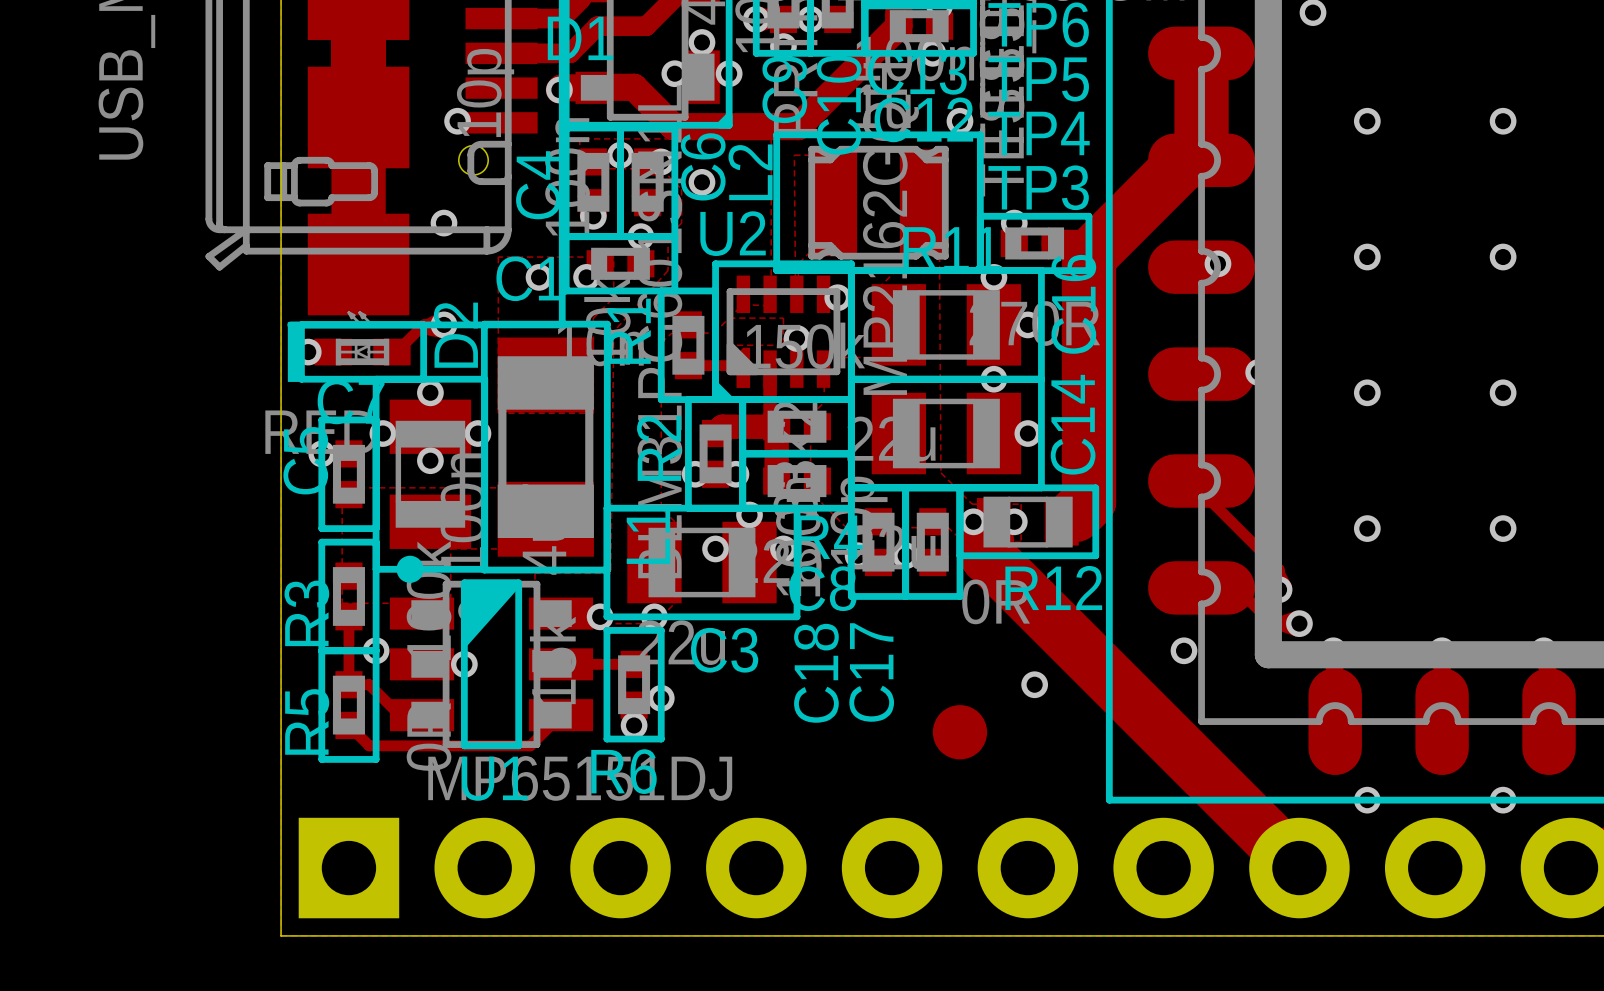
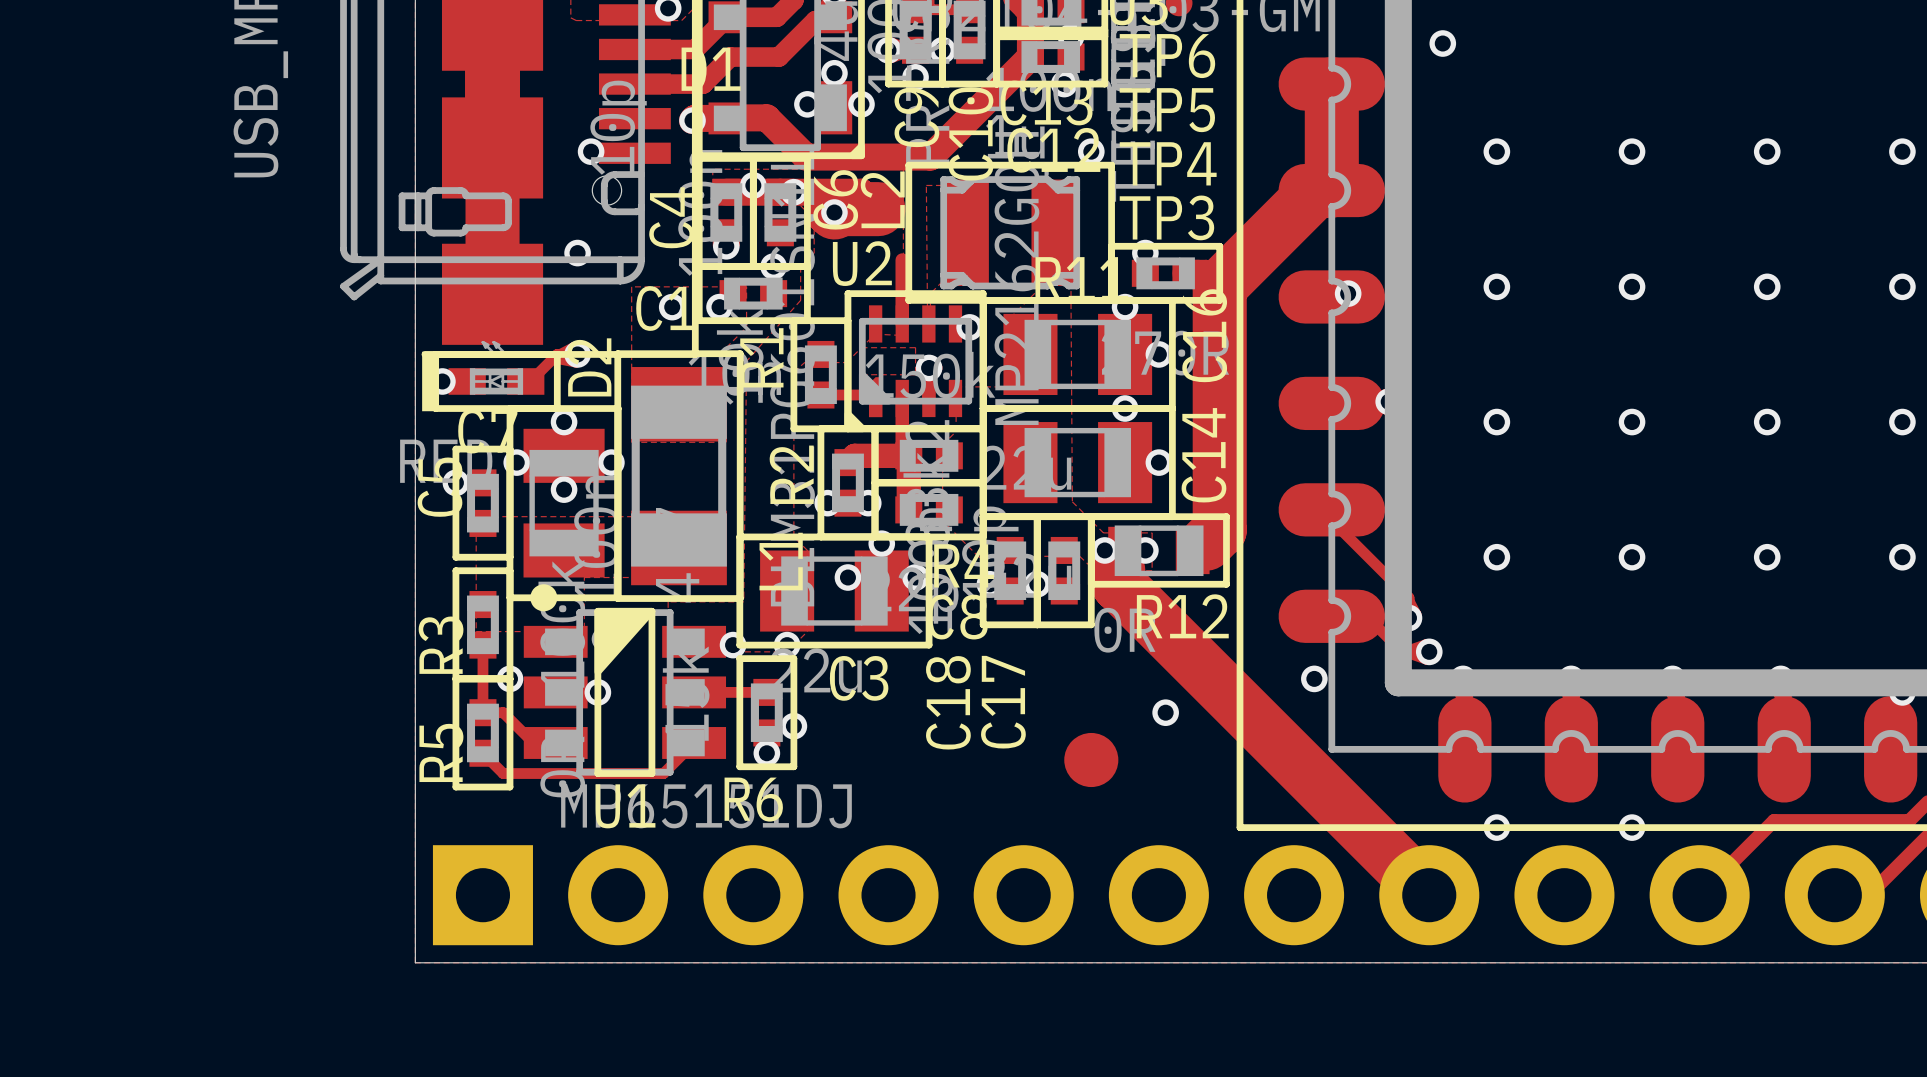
track: none -> (726, 192) (861, 192) (878, 209) (831, 209) (834, 212)
track: none -> (902, 260) (902, 323)

